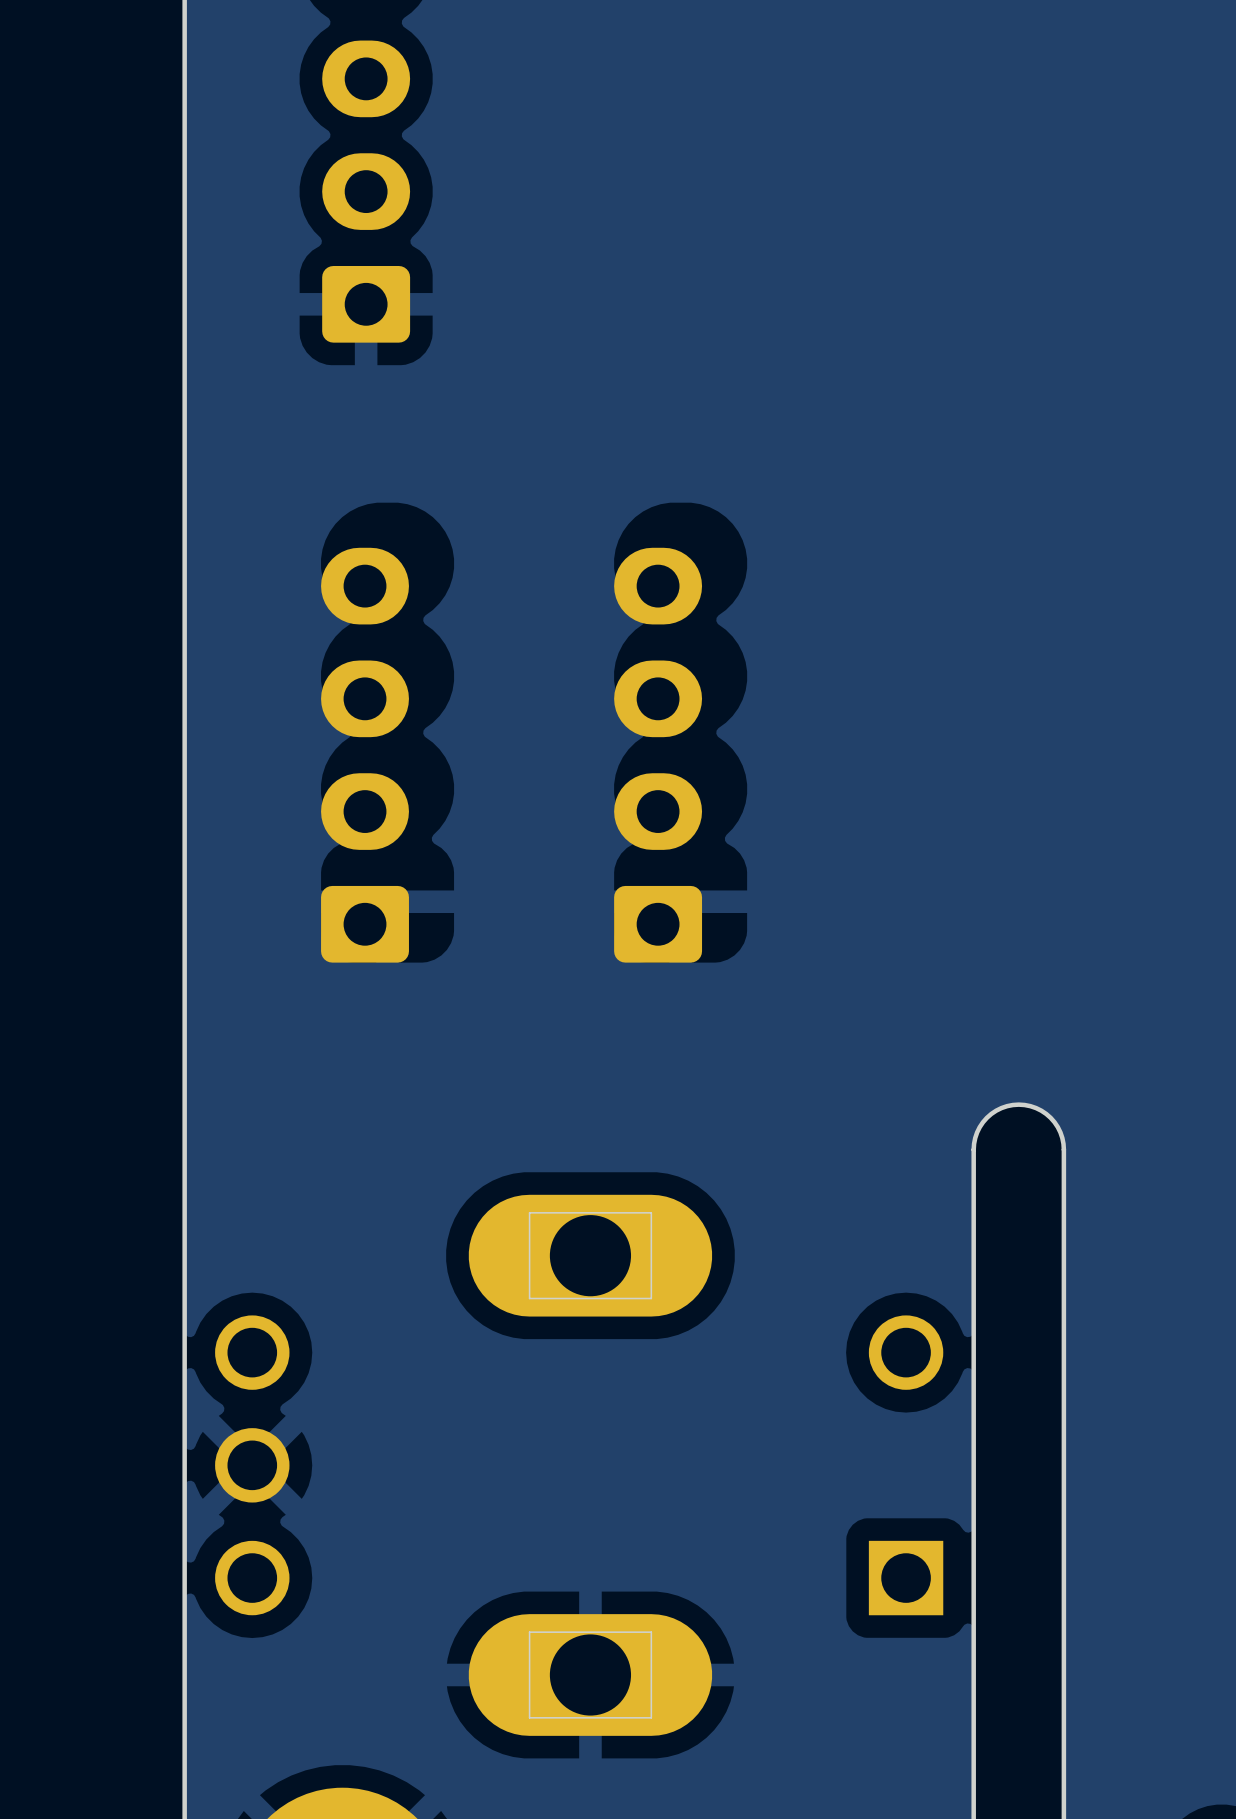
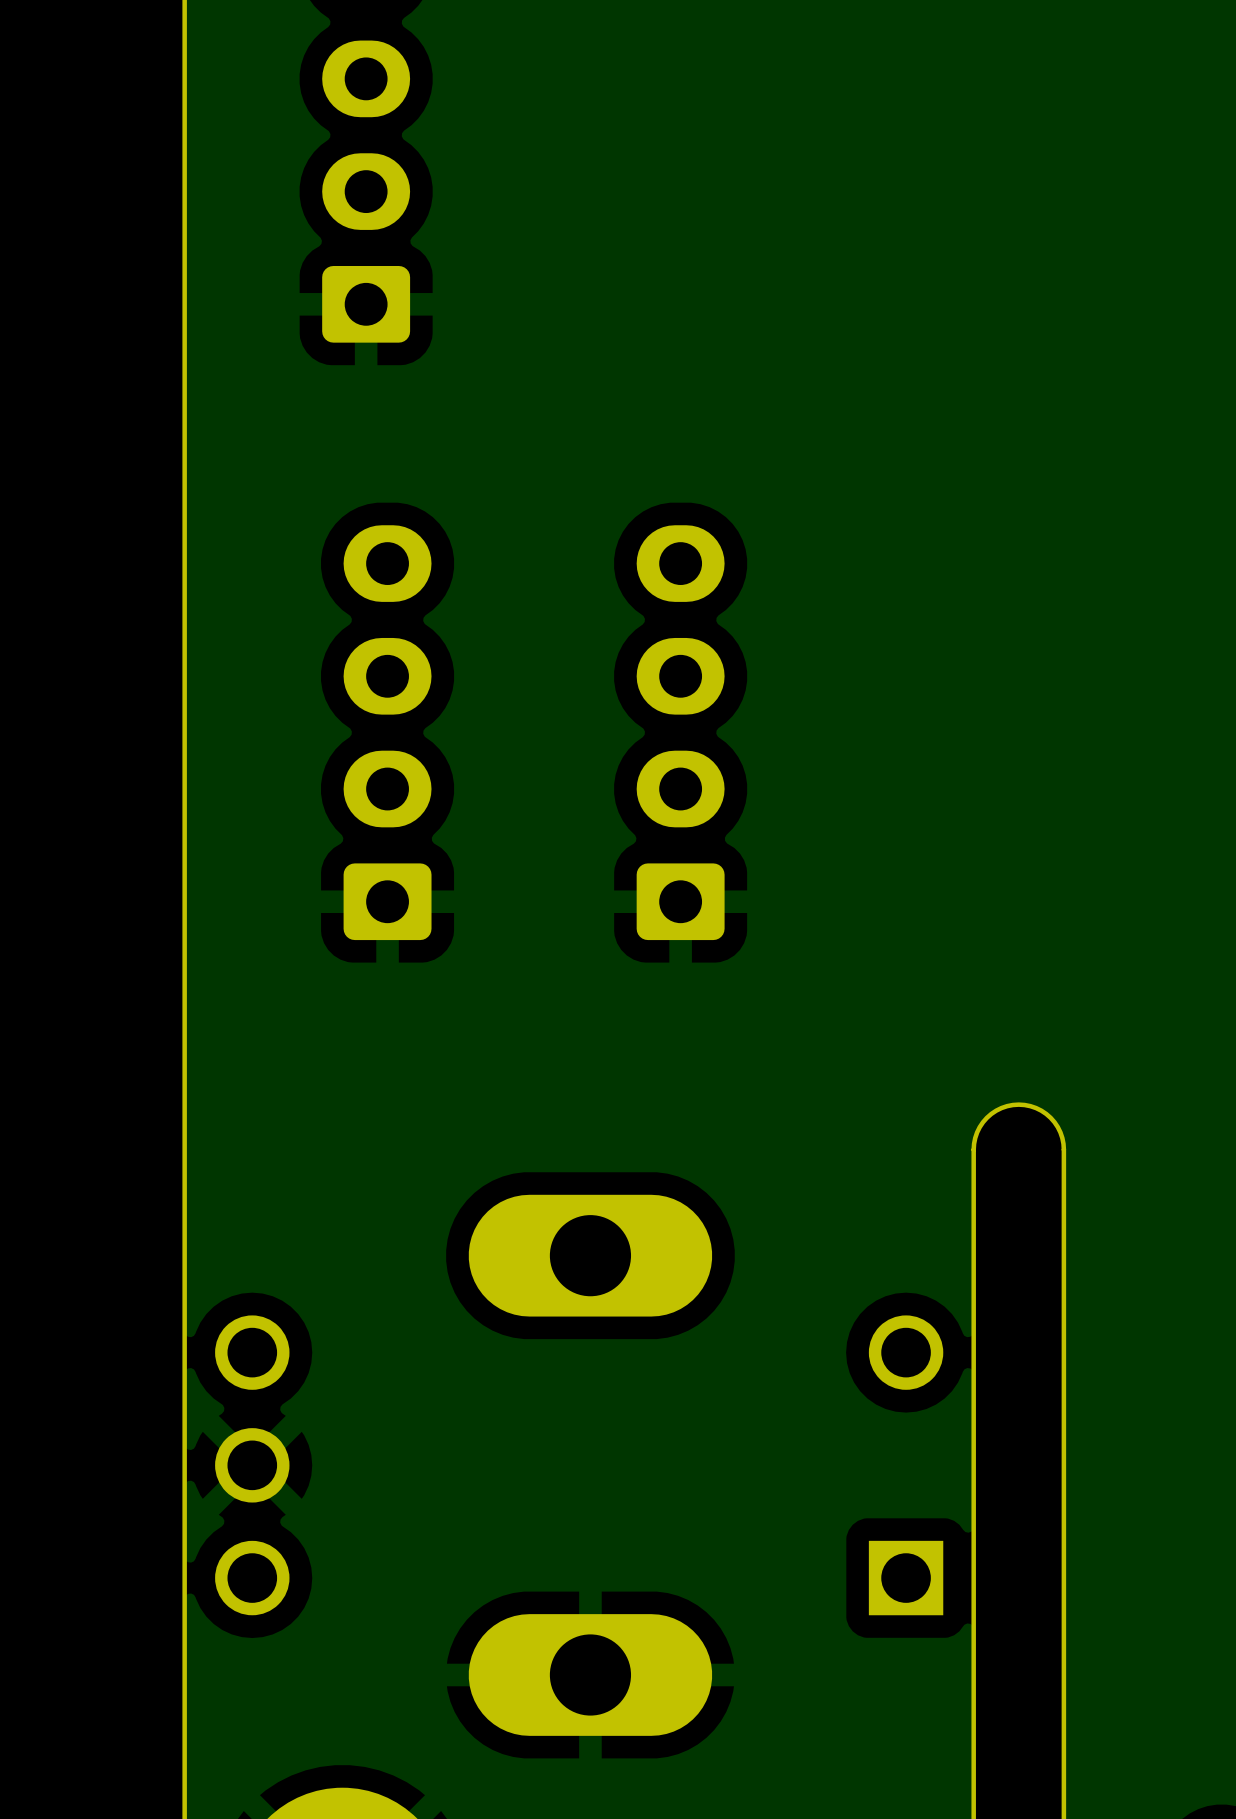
part position: (365, 755) -> (387, 732)
part position: (658, 755) -> (680, 732)

